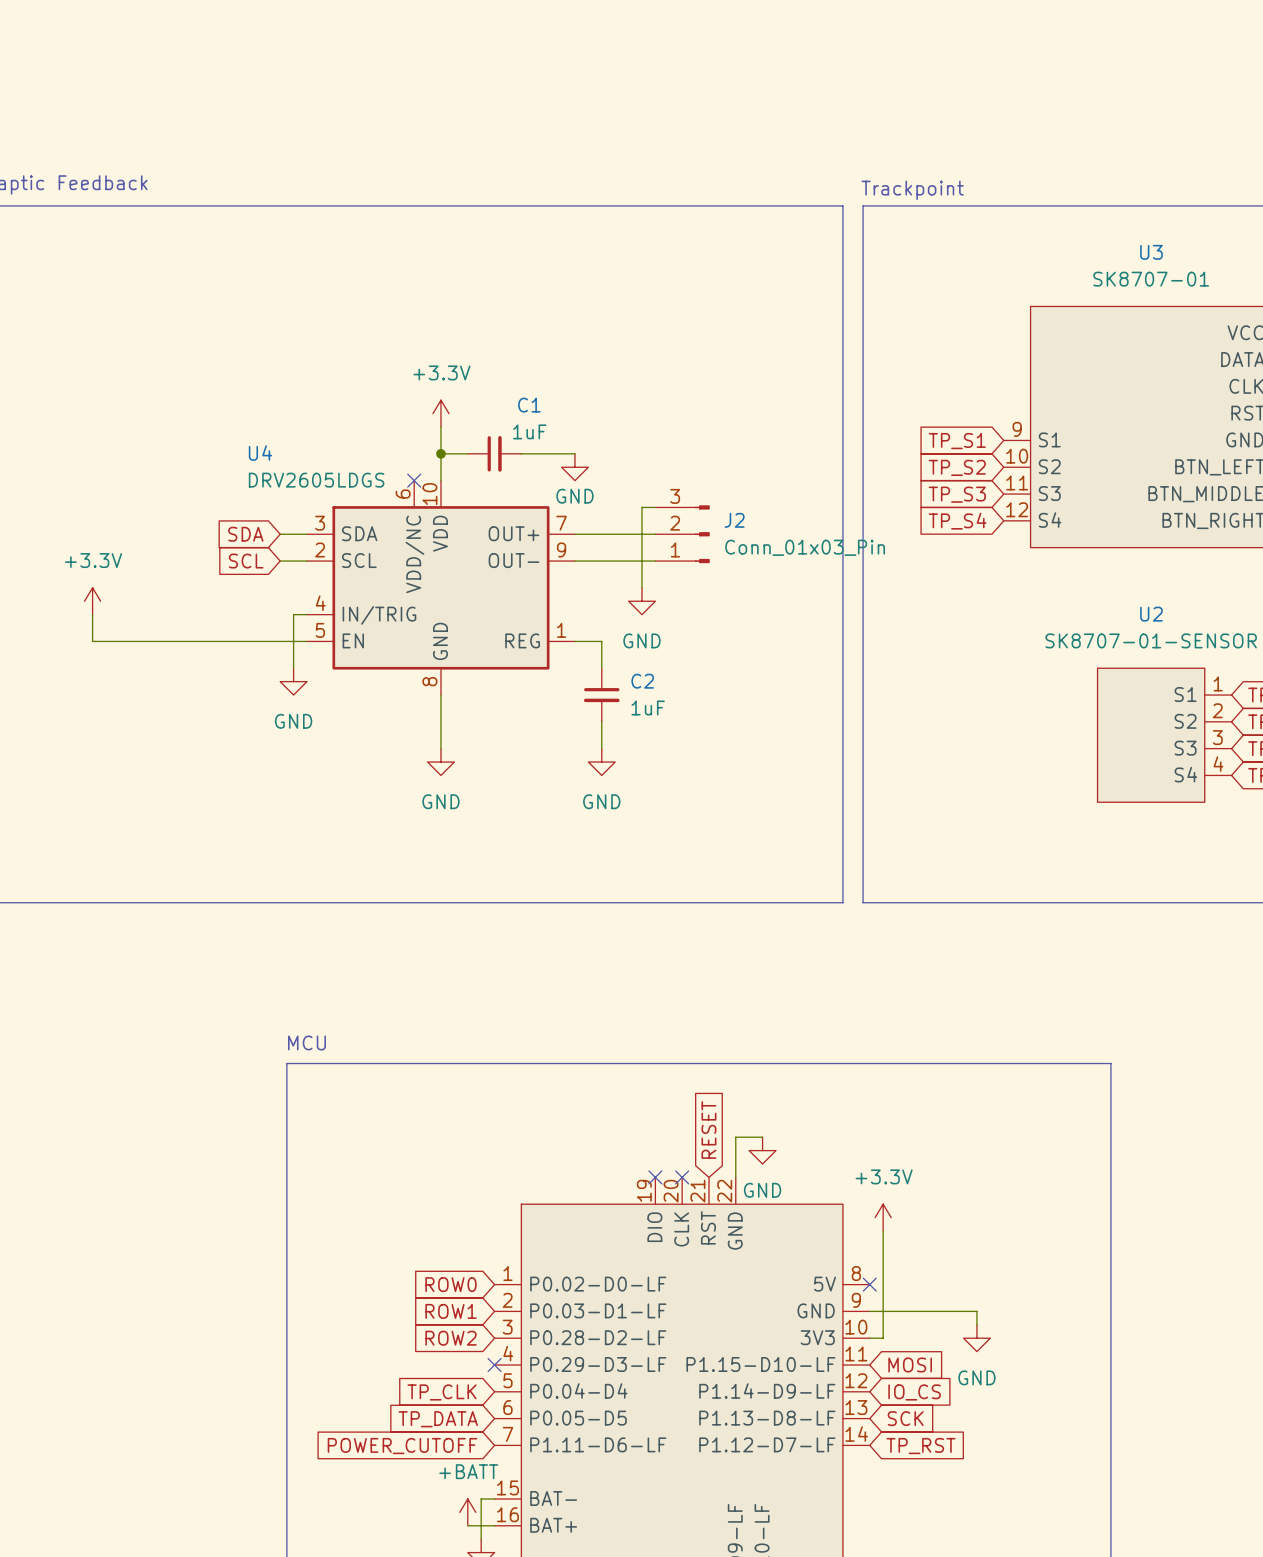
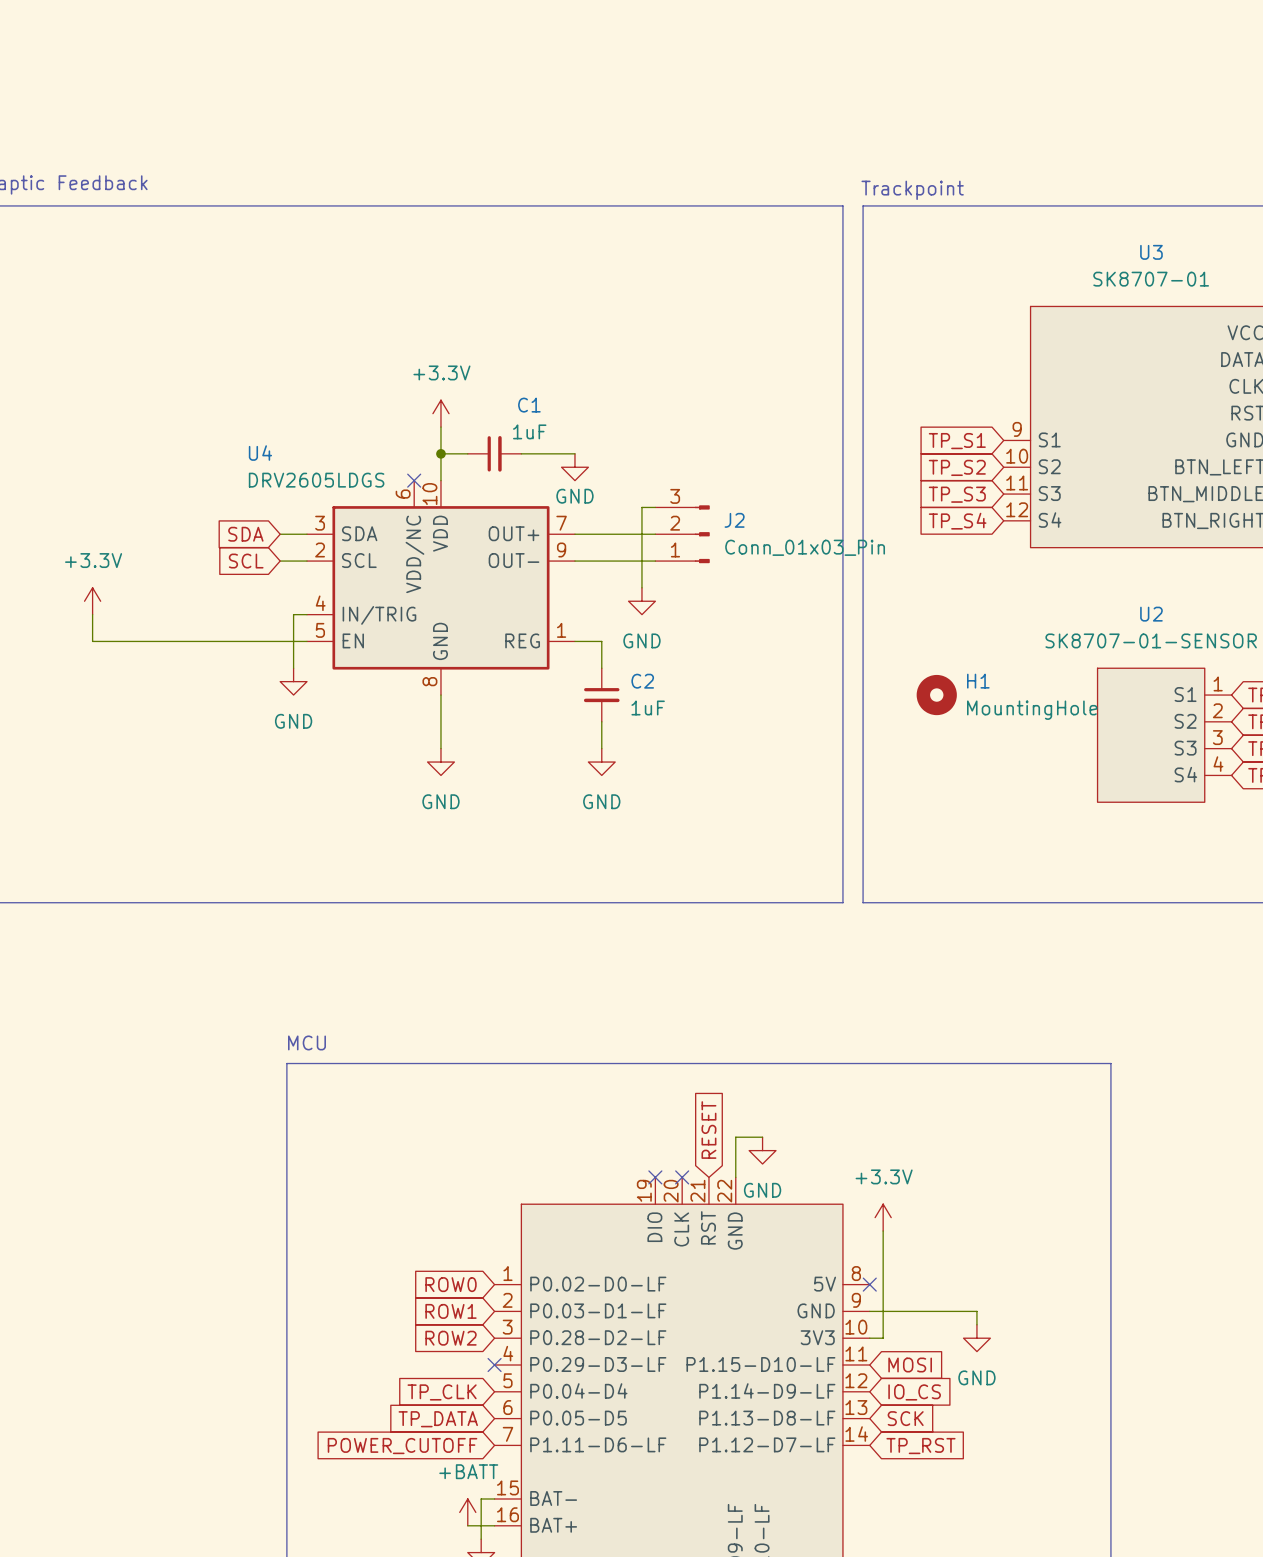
H1: none -> MountingHole (936, 695)

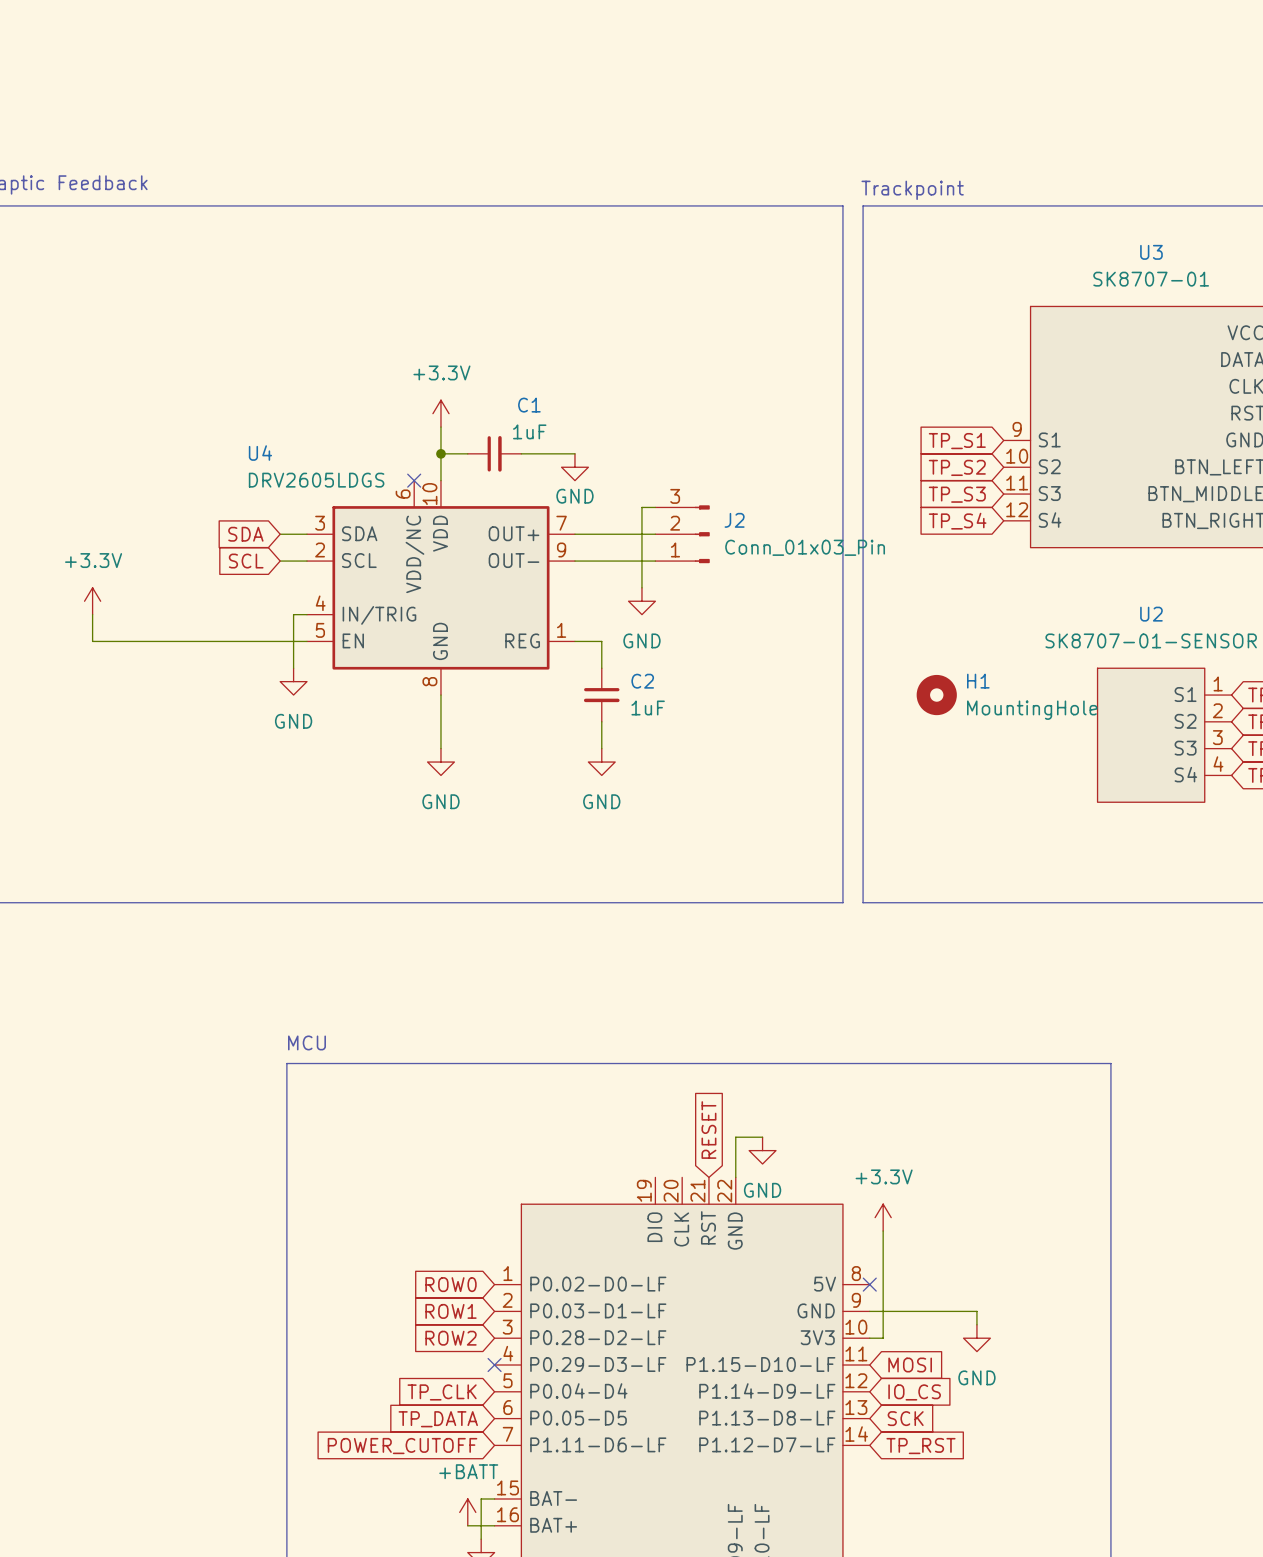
no-connect mark: (655, 1177) -> none
no-connect mark: (682, 1177) -> none

